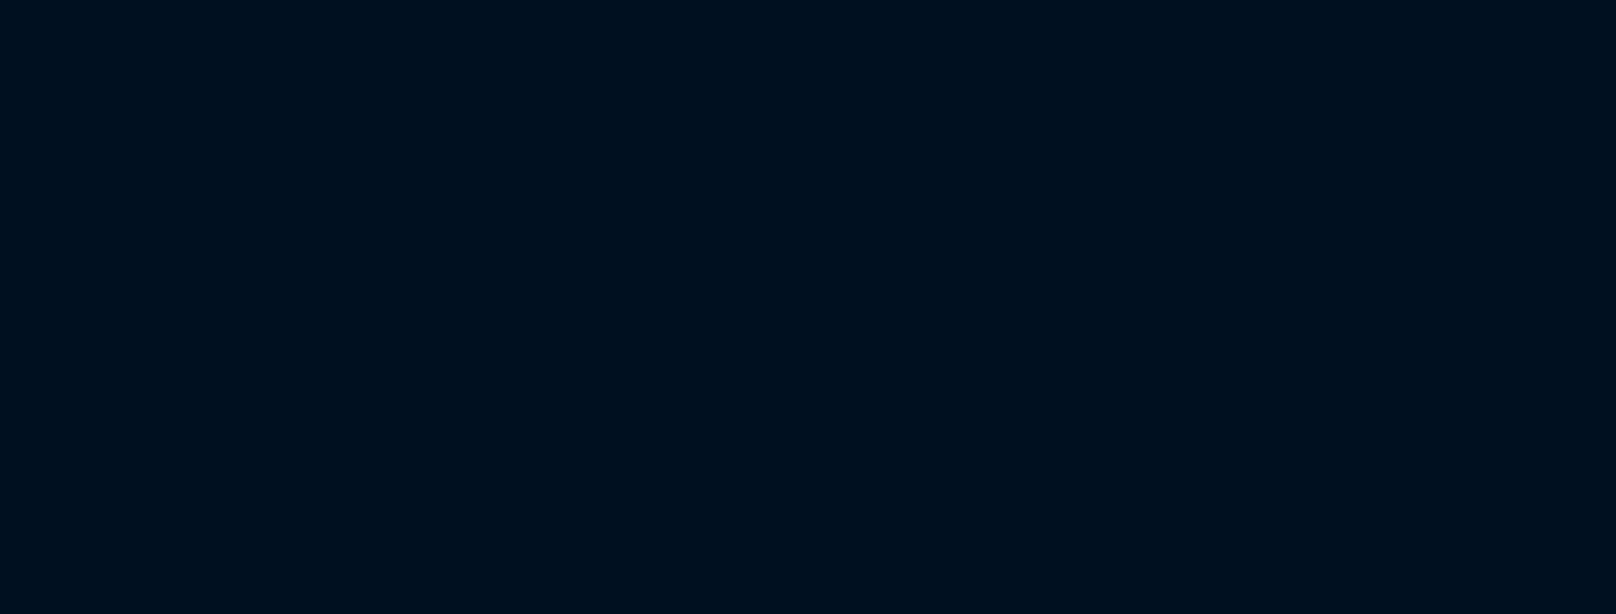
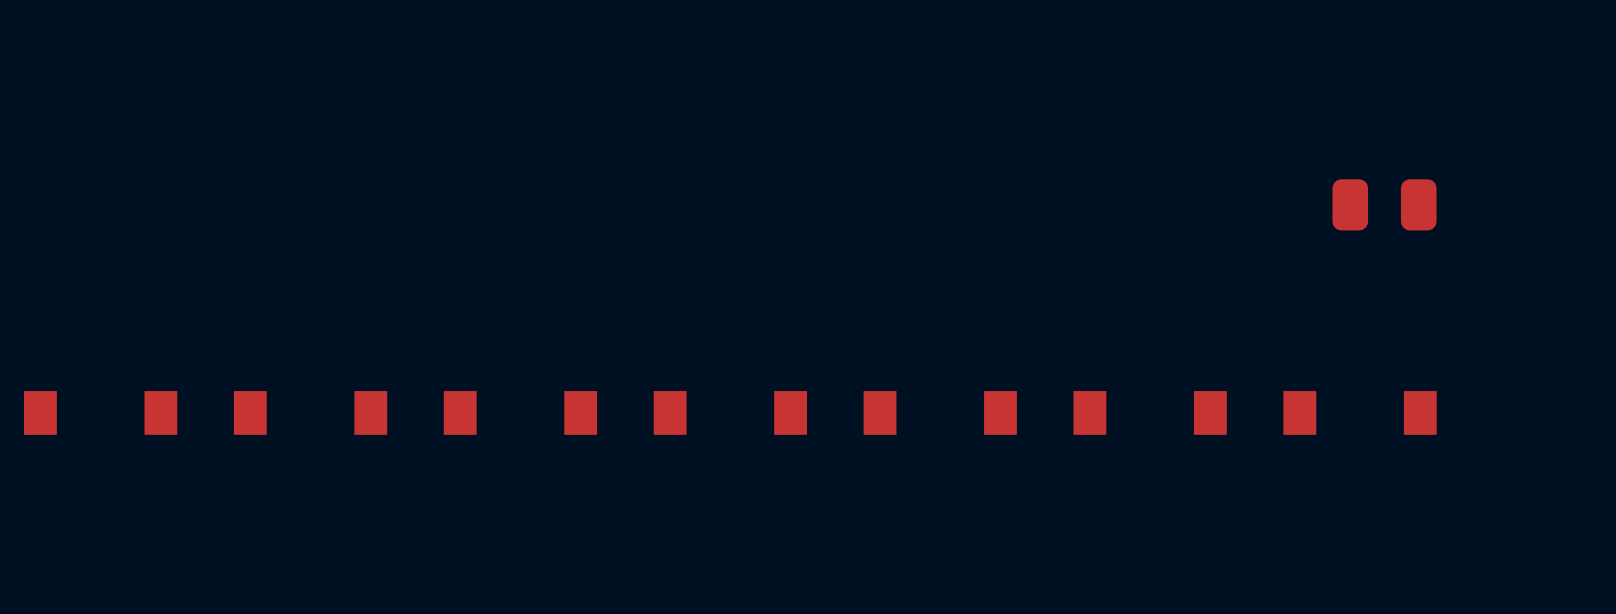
part: none -> (1384, 204)
part: none -> (100, 412)
part: none -> (310, 412)
part: none -> (520, 412)
part: none -> (730, 412)
part: none -> (940, 412)
part: none -> (1150, 412)
part: none -> (1360, 412)

